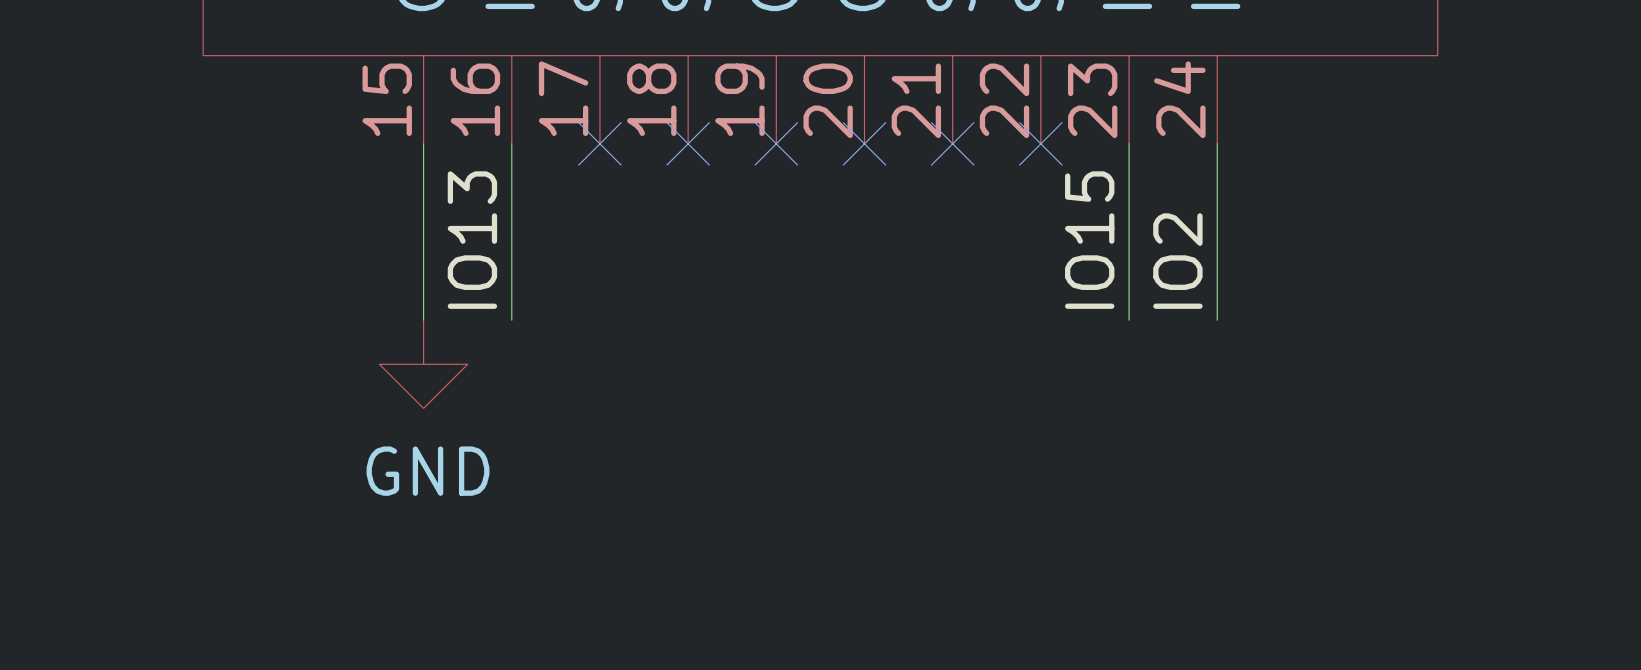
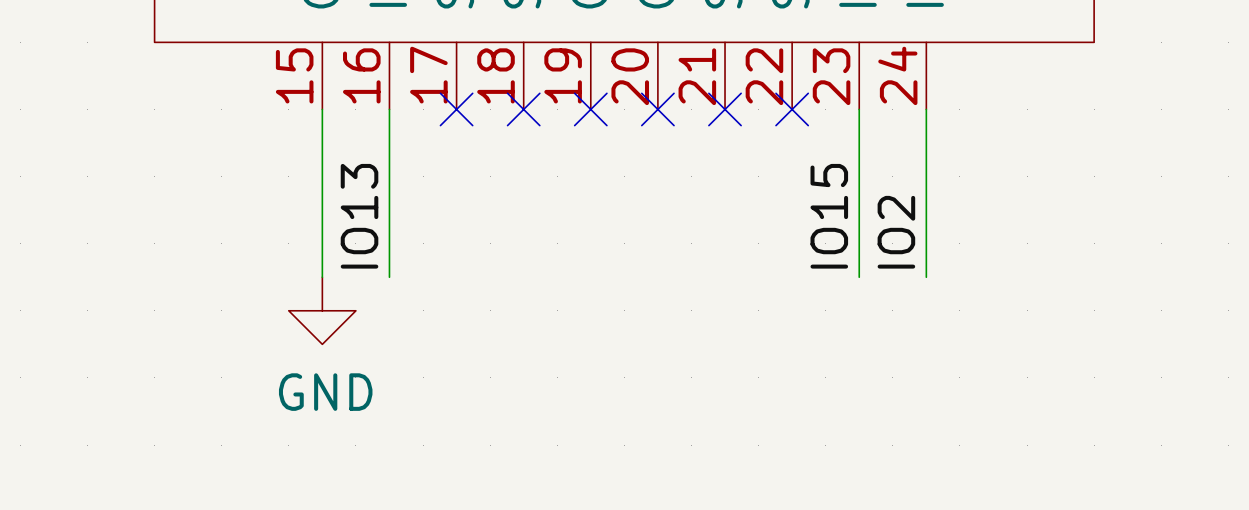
label position: IO13 (472, 240) -> IO13 (359, 216)
label position: IO15 (1089, 240) -> IO15 (829, 216)
label position: IO2 (1177, 261) -> IO2 (896, 232)
wire: none -> (389, 243) (389, 277)
wire: none -> (859, 243) (859, 277)
wire: none -> (926, 243) (926, 277)
power symbol position: GND (423, 364) -> GND (322, 310)

